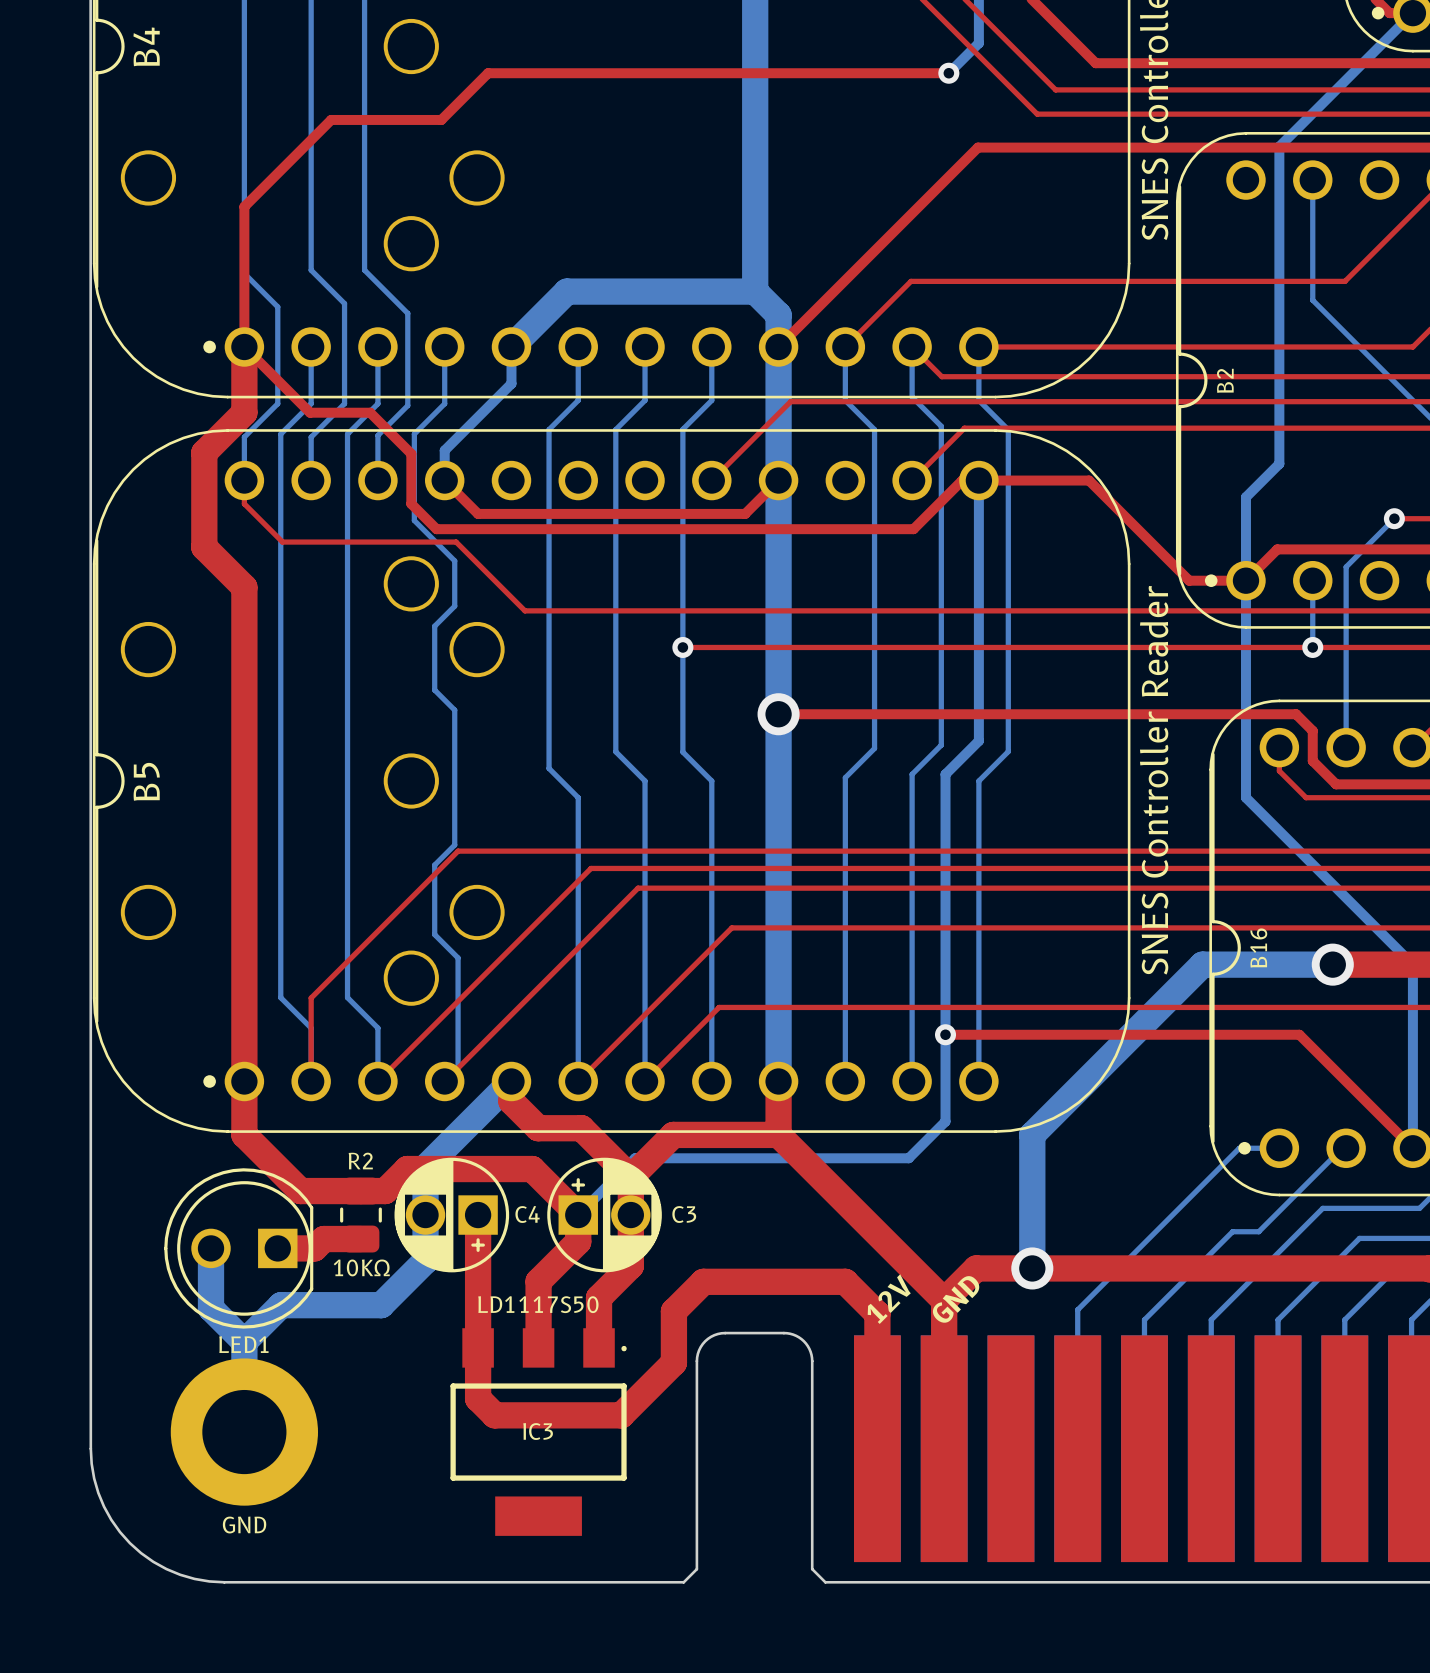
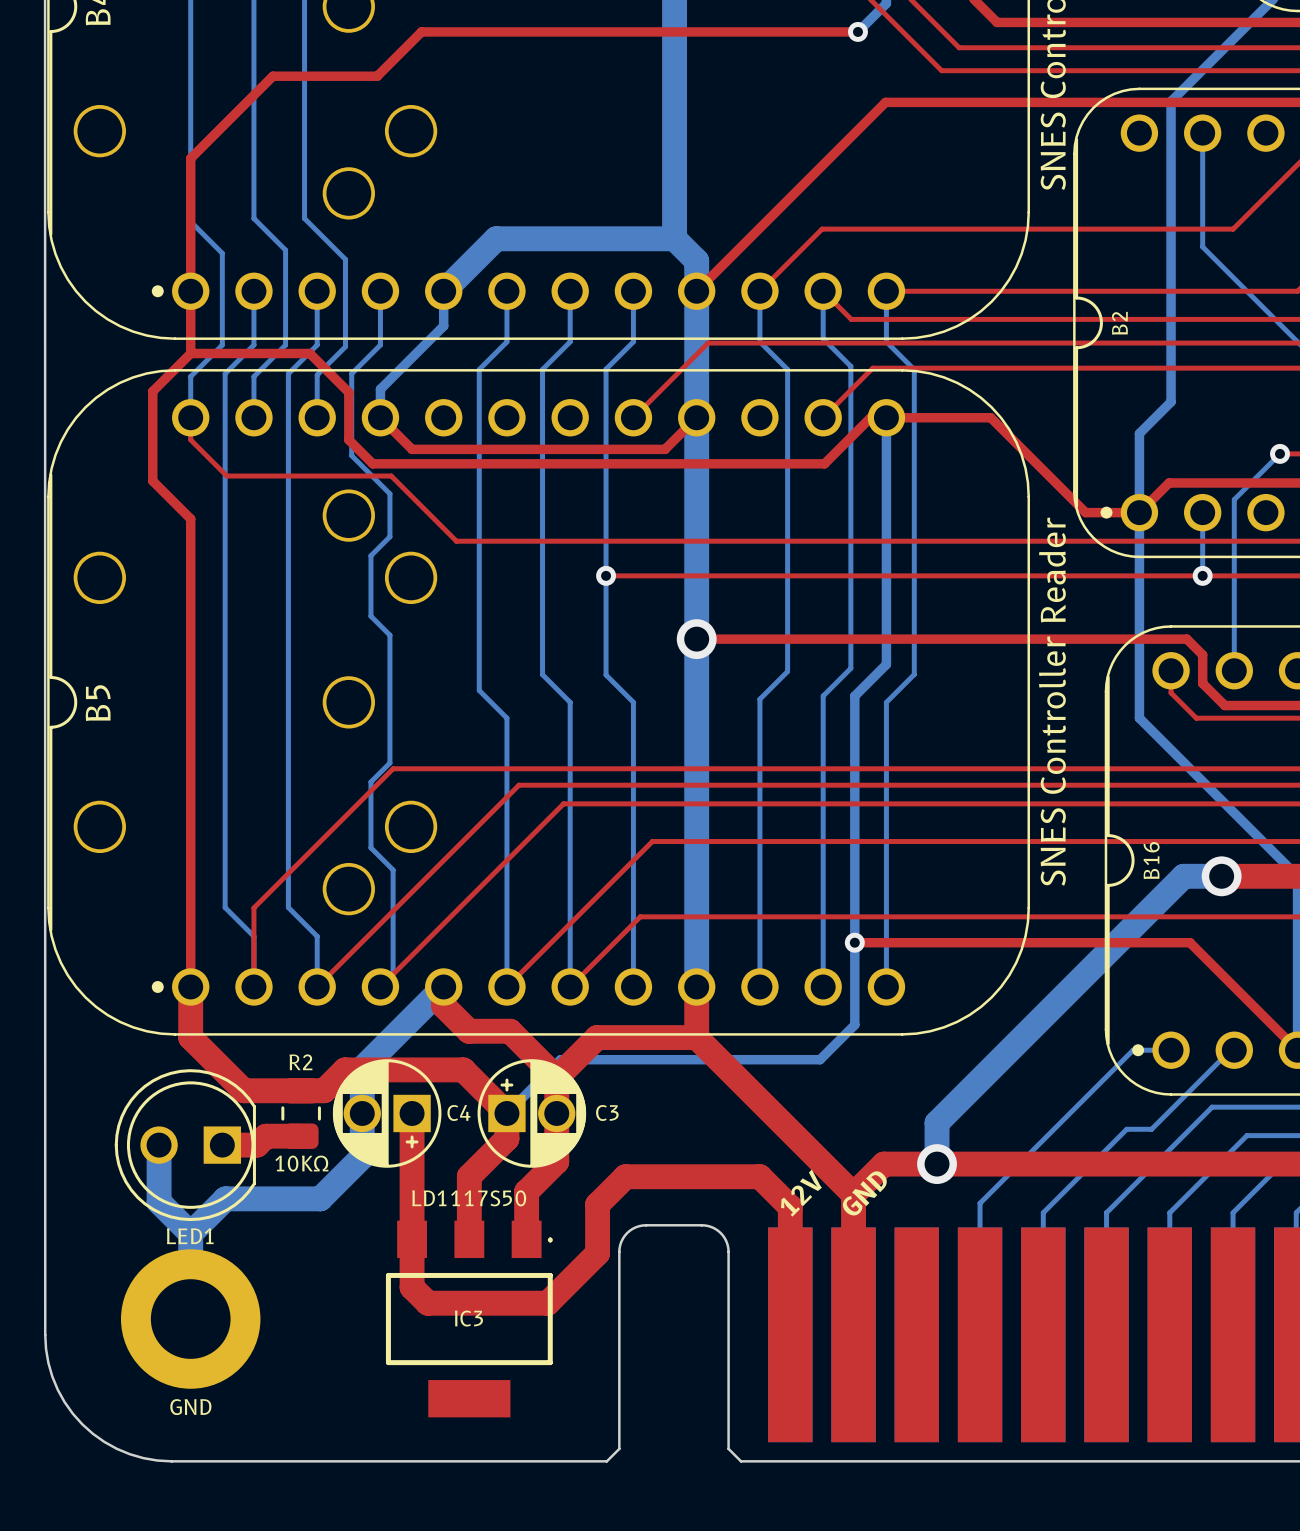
top track: (244, 346) (310, 412) -> (190, 353) (252, 353)
top track width: thick (244, 346) (244, 412) (204, 452) (204, 547) (244, 587) (244, 1081) -> thin (190, 291) (190, 353) (152, 391) (152, 481) (190, 518) (190, 986)
bottom track: (1292, 964) (1202, 964) (1032, 1134) (1032, 1225) -> (1183, 876) (937, 1122)

